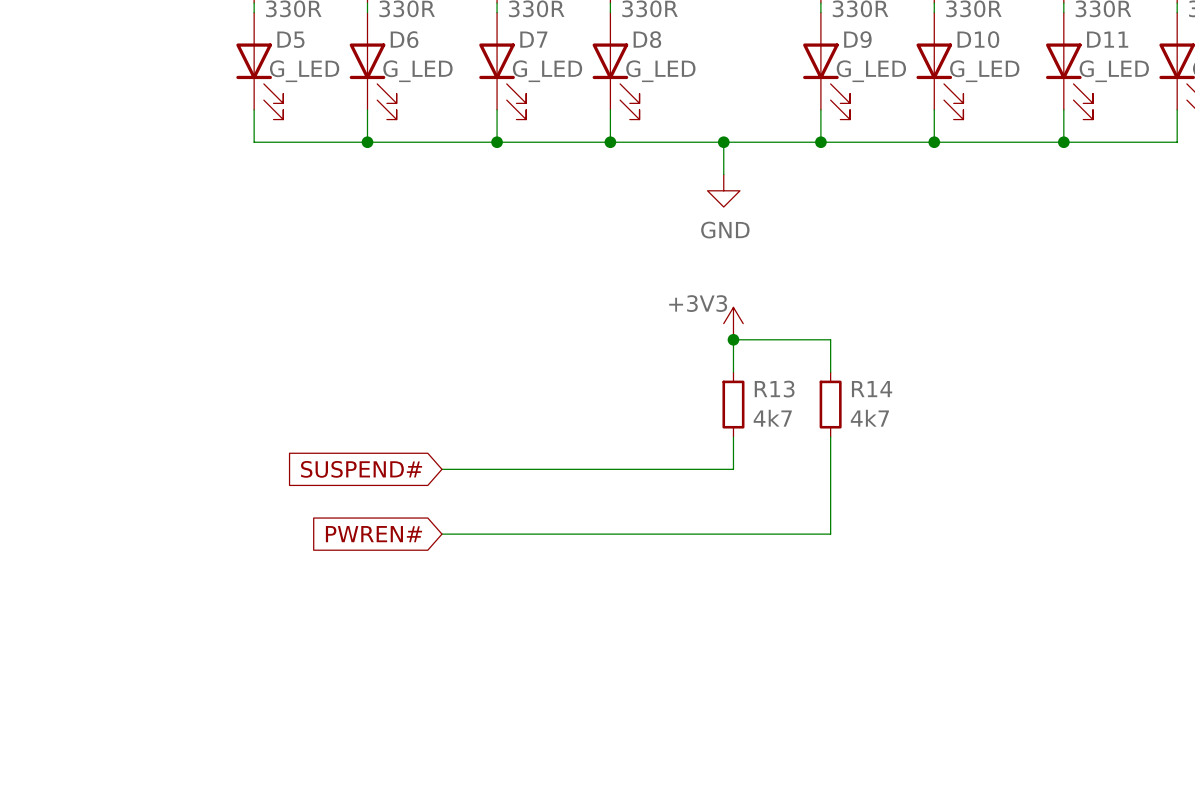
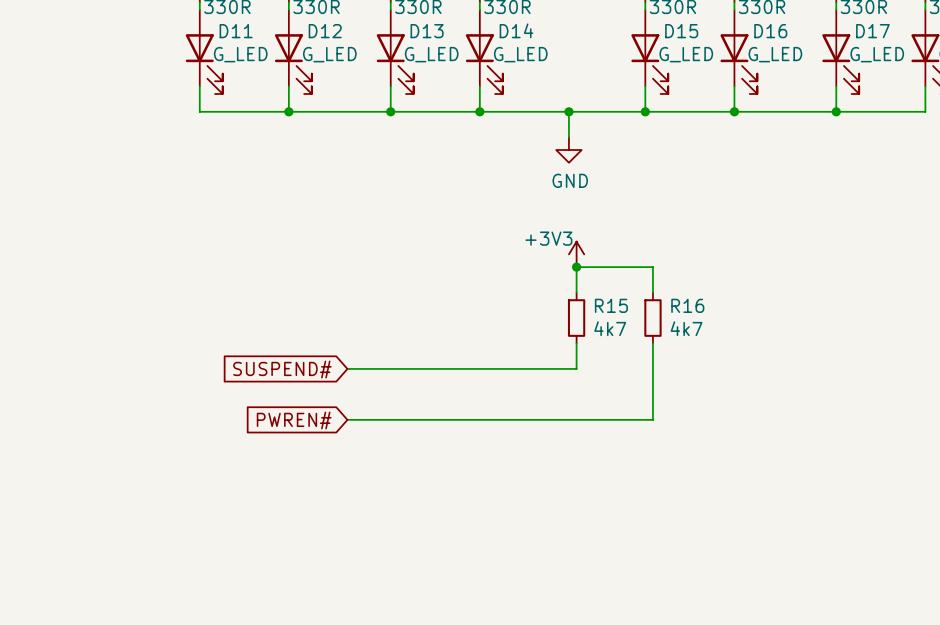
D5 name: D5 (290, 39) -> D11 (236, 31)
D6 name: D6 (404, 39) -> D12 (325, 31)
D7 name: D7 (533, 39) -> D13 (427, 31)
D8 name: D8 (647, 39) -> D14 (516, 30)
D9 name: D9 (857, 39) -> D15 (681, 31)
D10 name: D10 (978, 39) -> D16 (770, 31)
D11 name: D11 (1107, 39) -> D17 (872, 31)
R13 name: R13 (774, 389) -> R15 (611, 305)
R14 name: R14 (872, 389) -> R16 (687, 305)

